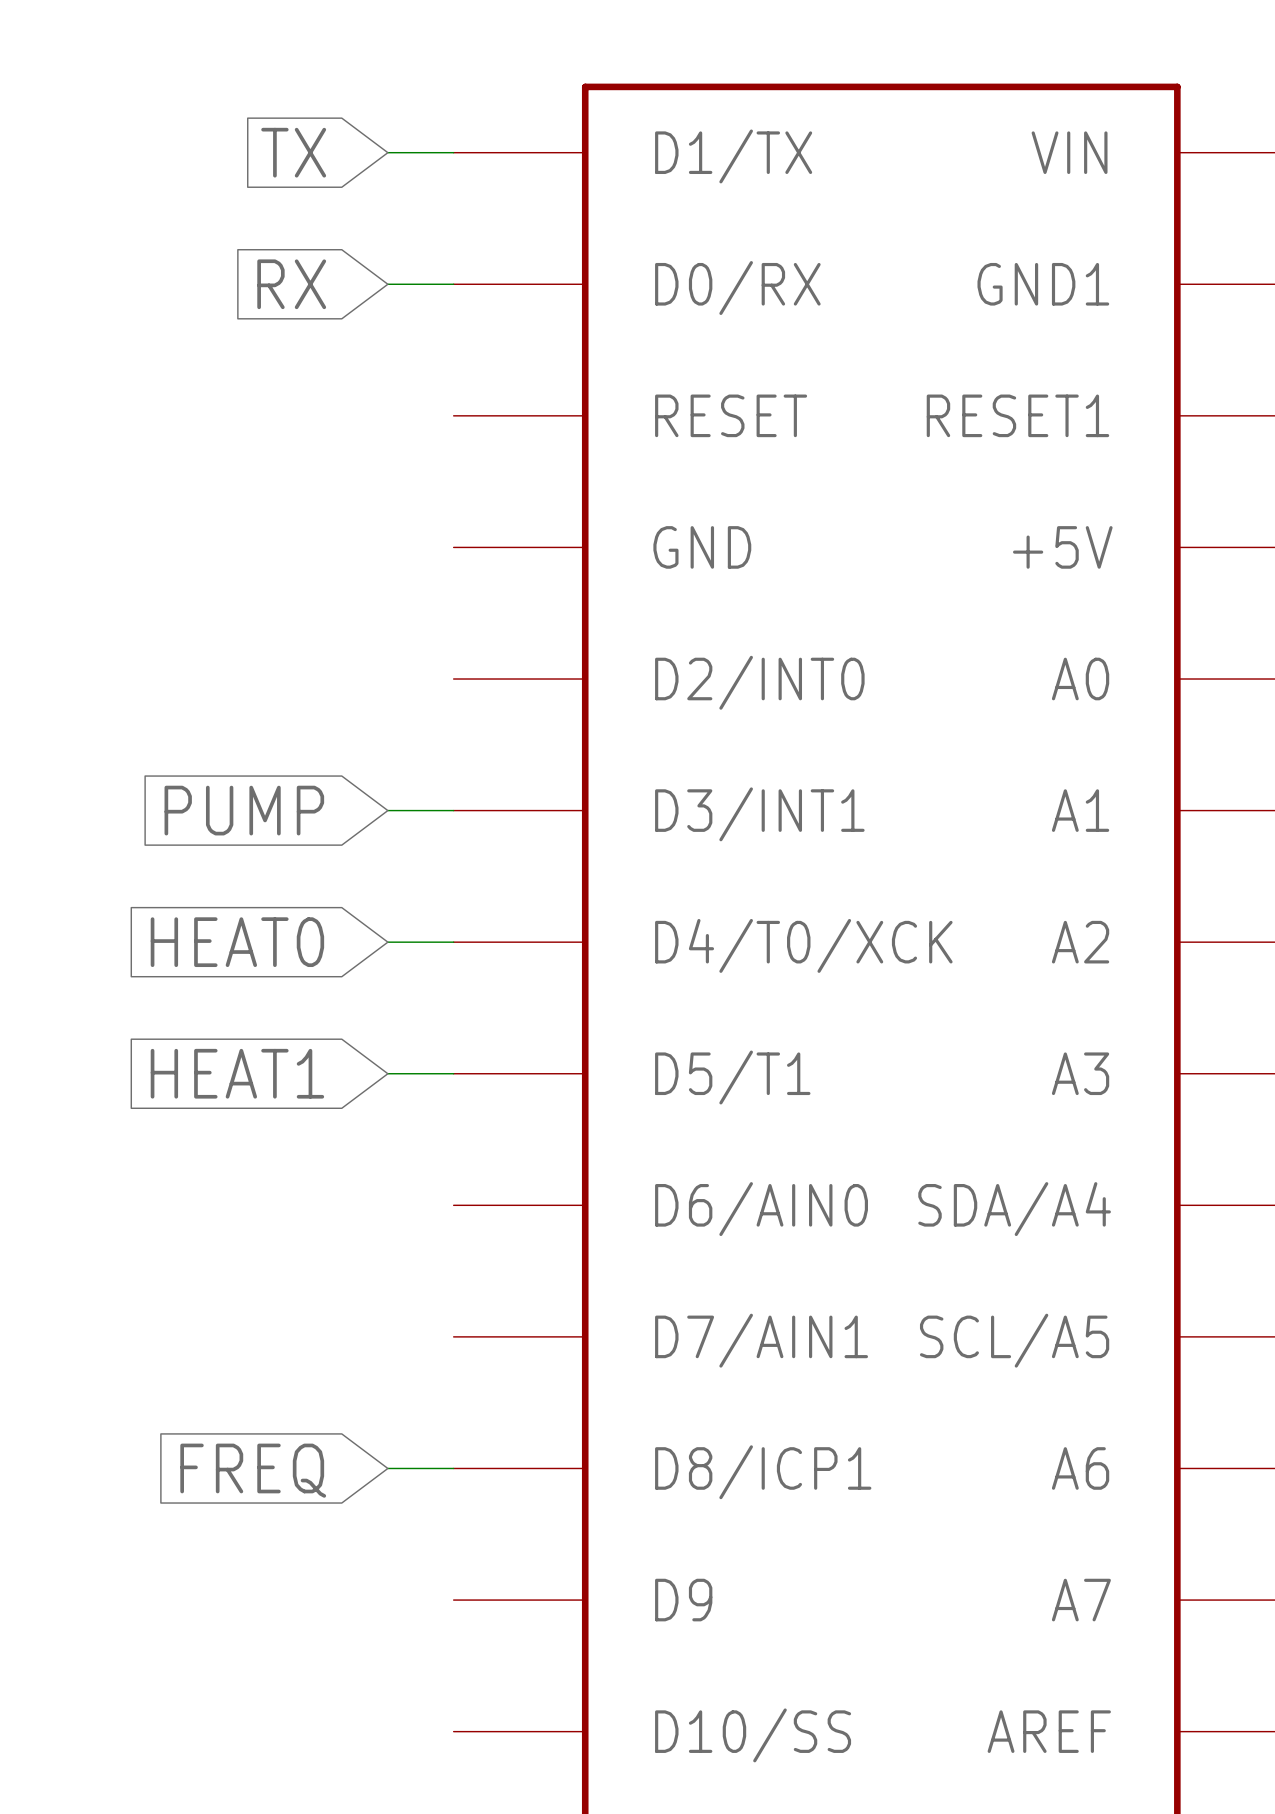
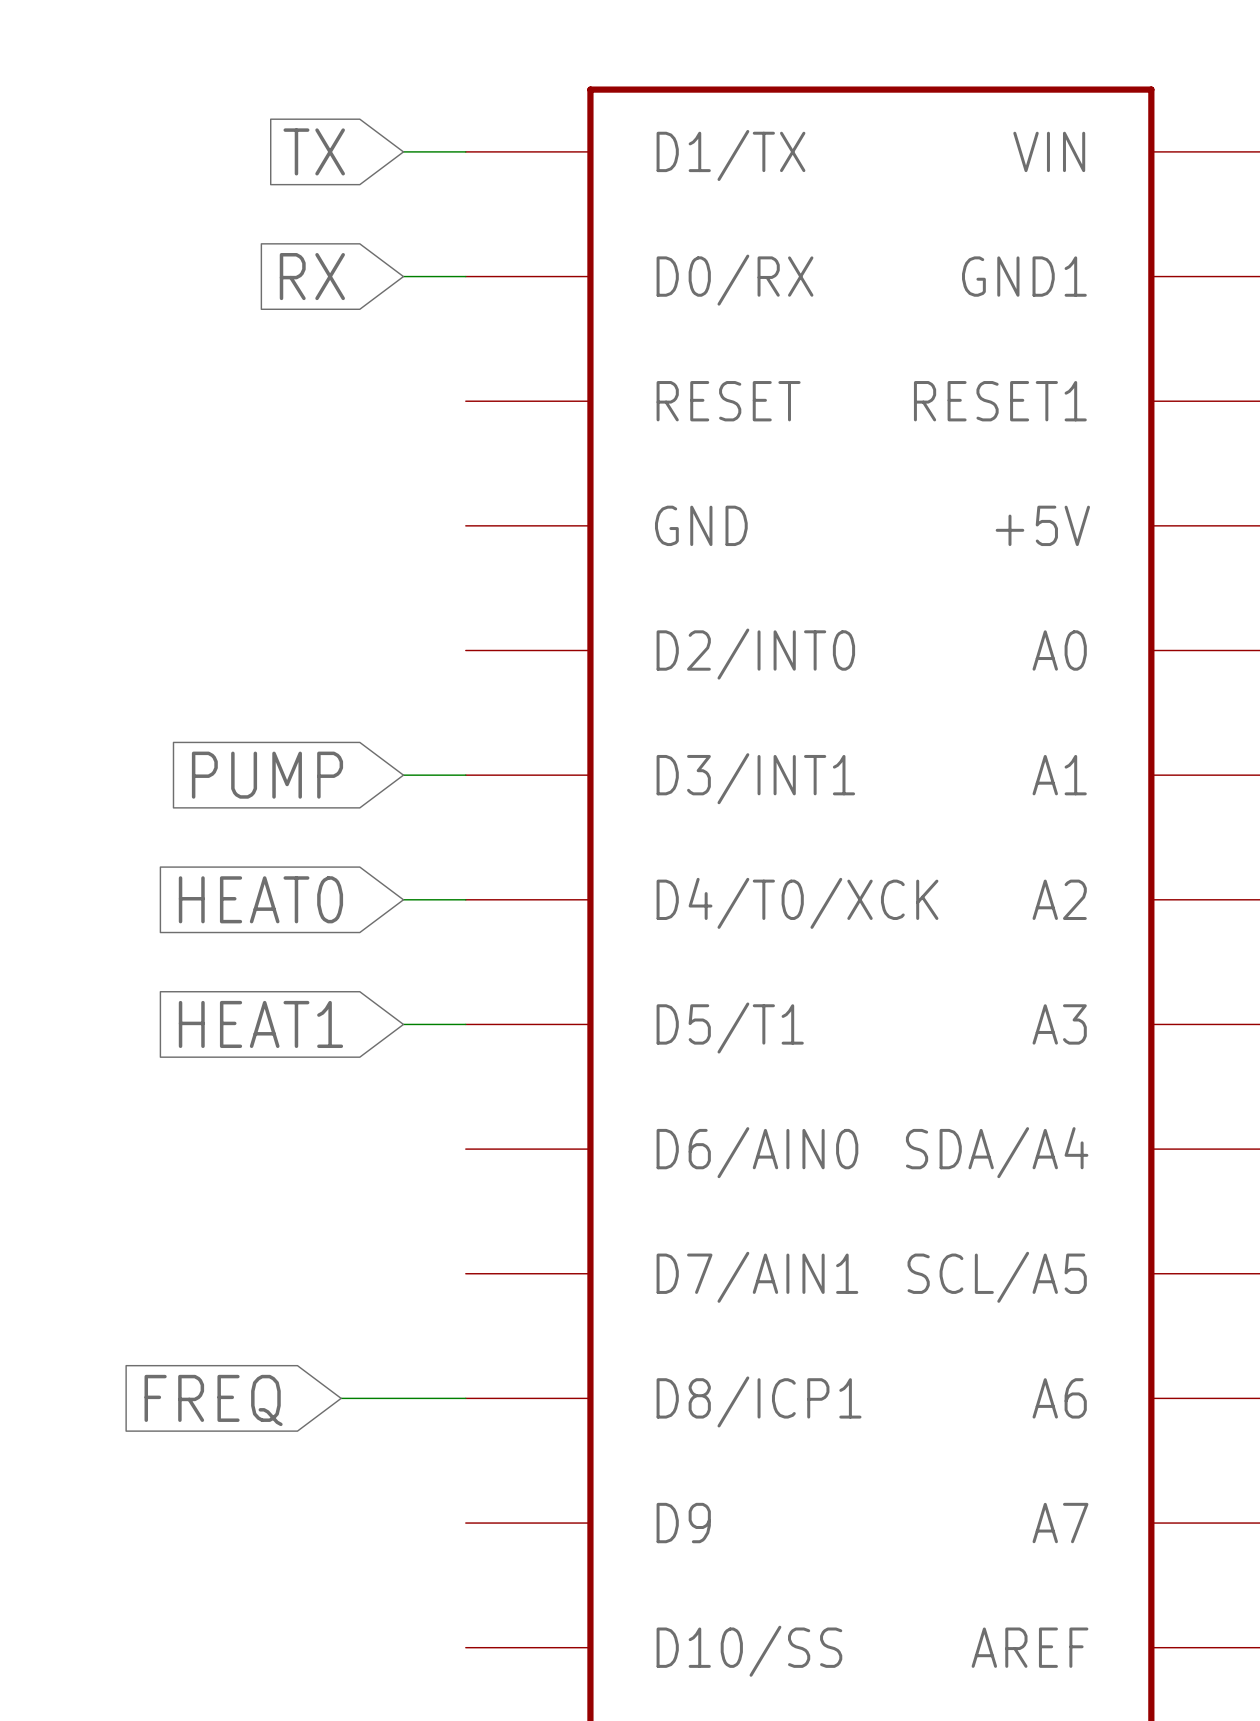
wire: none -> (341, 1398) (403, 1398)
global label position: FREQ (253, 1470) -> FREQ (213, 1400)

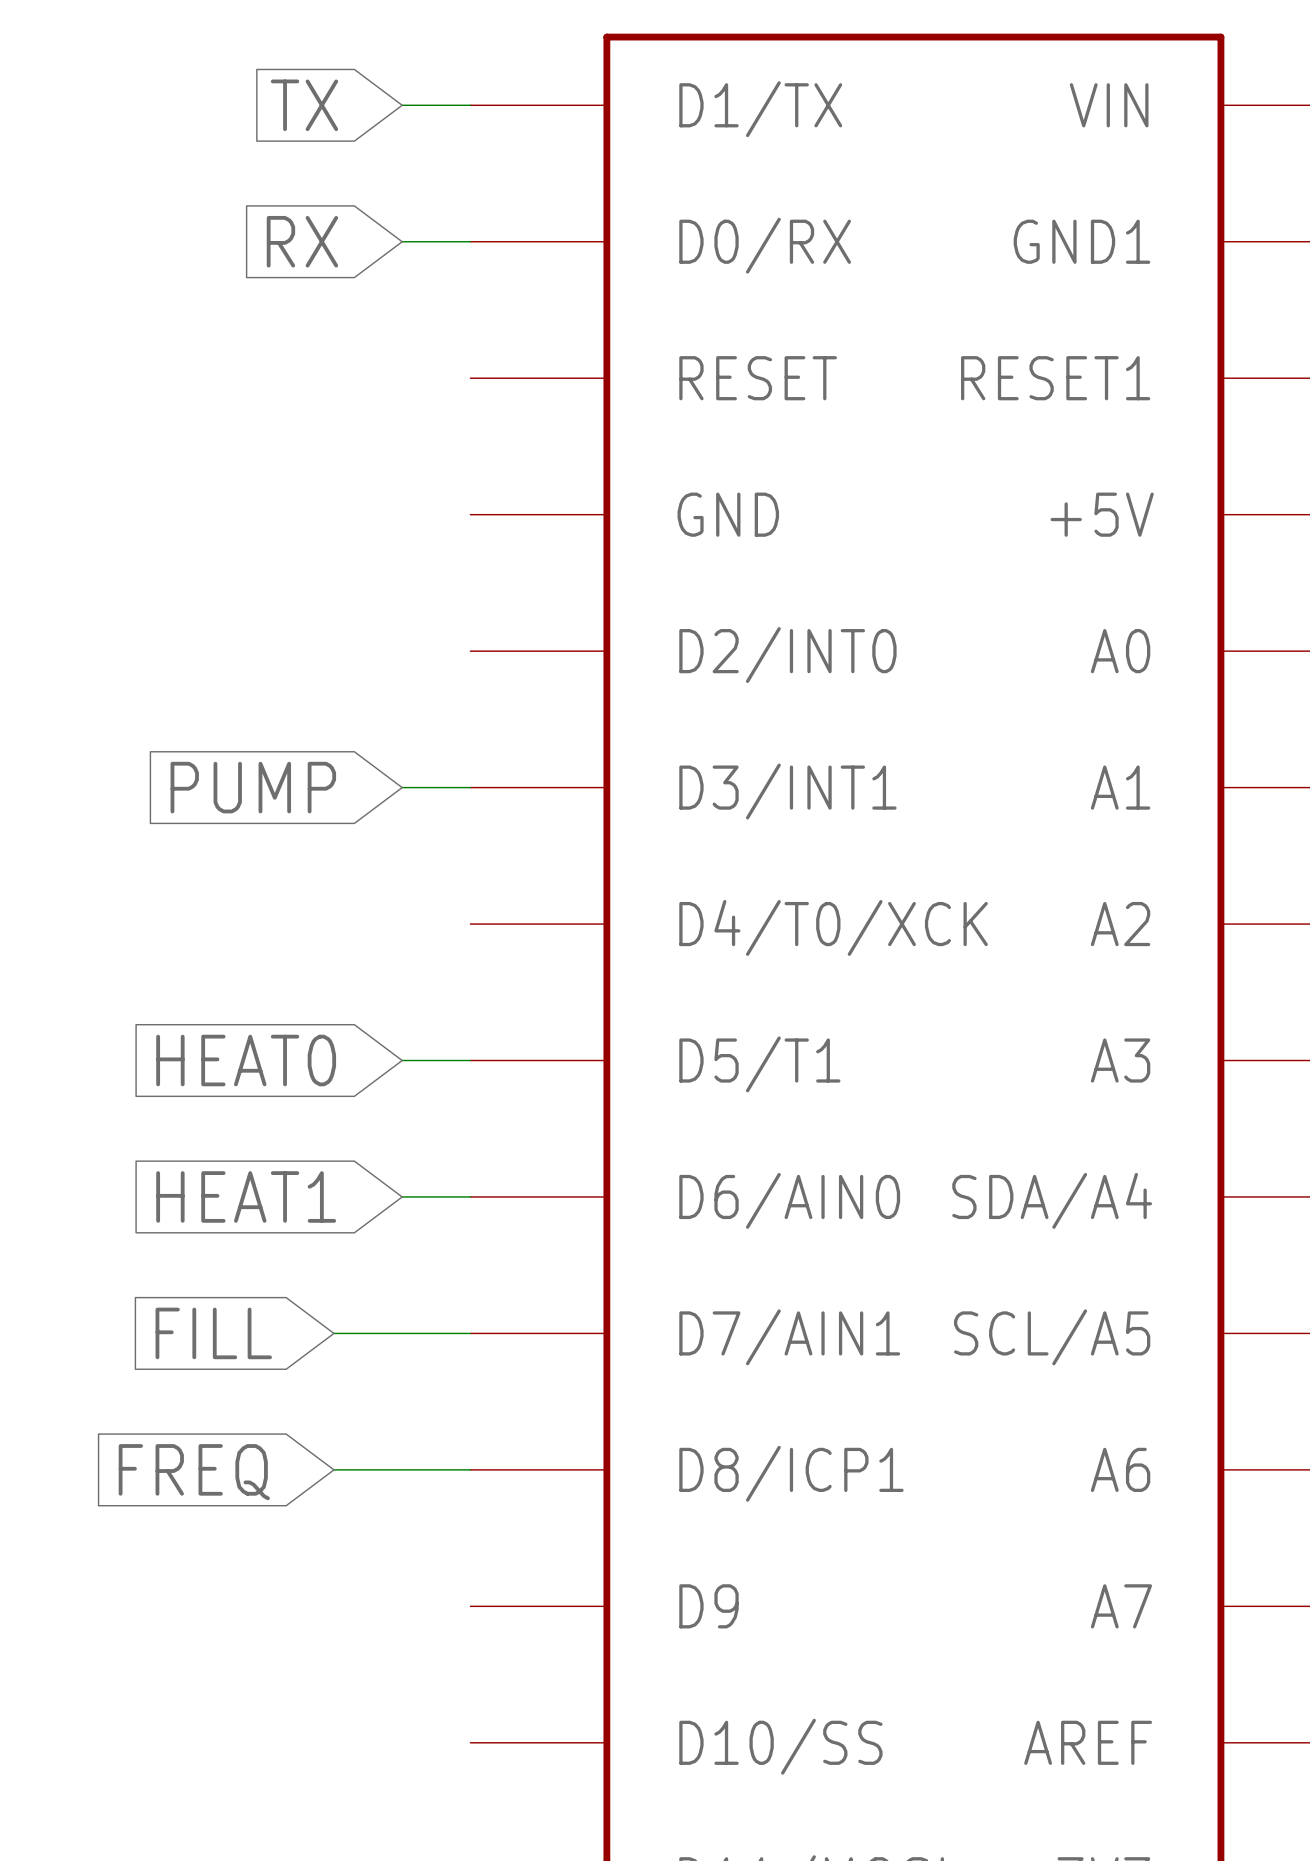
global label: HEAT0 (260, 899) -> none
wire: (403, 899) (465, 899) -> (402, 1196) (470, 1196)
global label: HEAT1 (260, 1024) -> HEAT0 (246, 1060)
global label: none -> HEAT1 (246, 1196)
global label: none -> FILL (213, 1333)
wire: none -> (333, 1333) (470, 1333)

